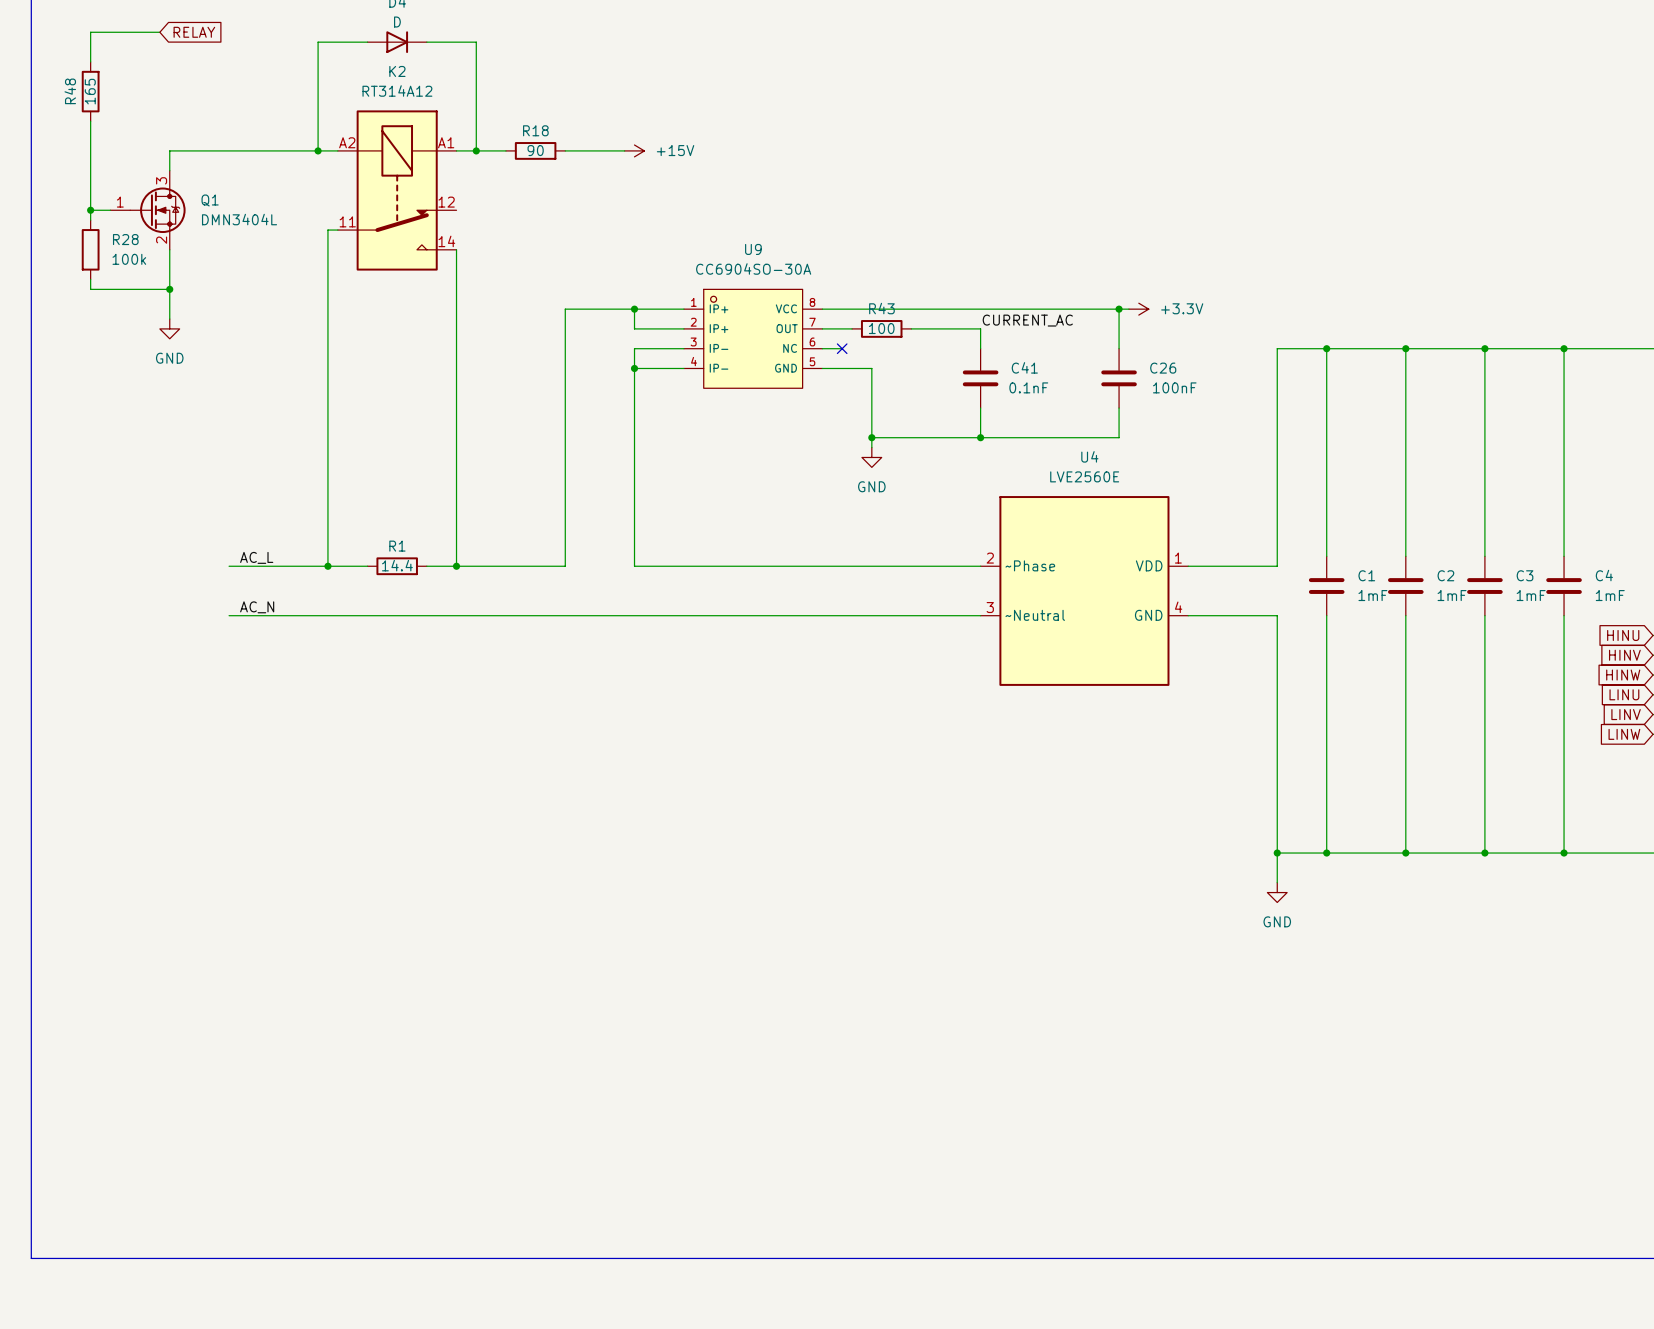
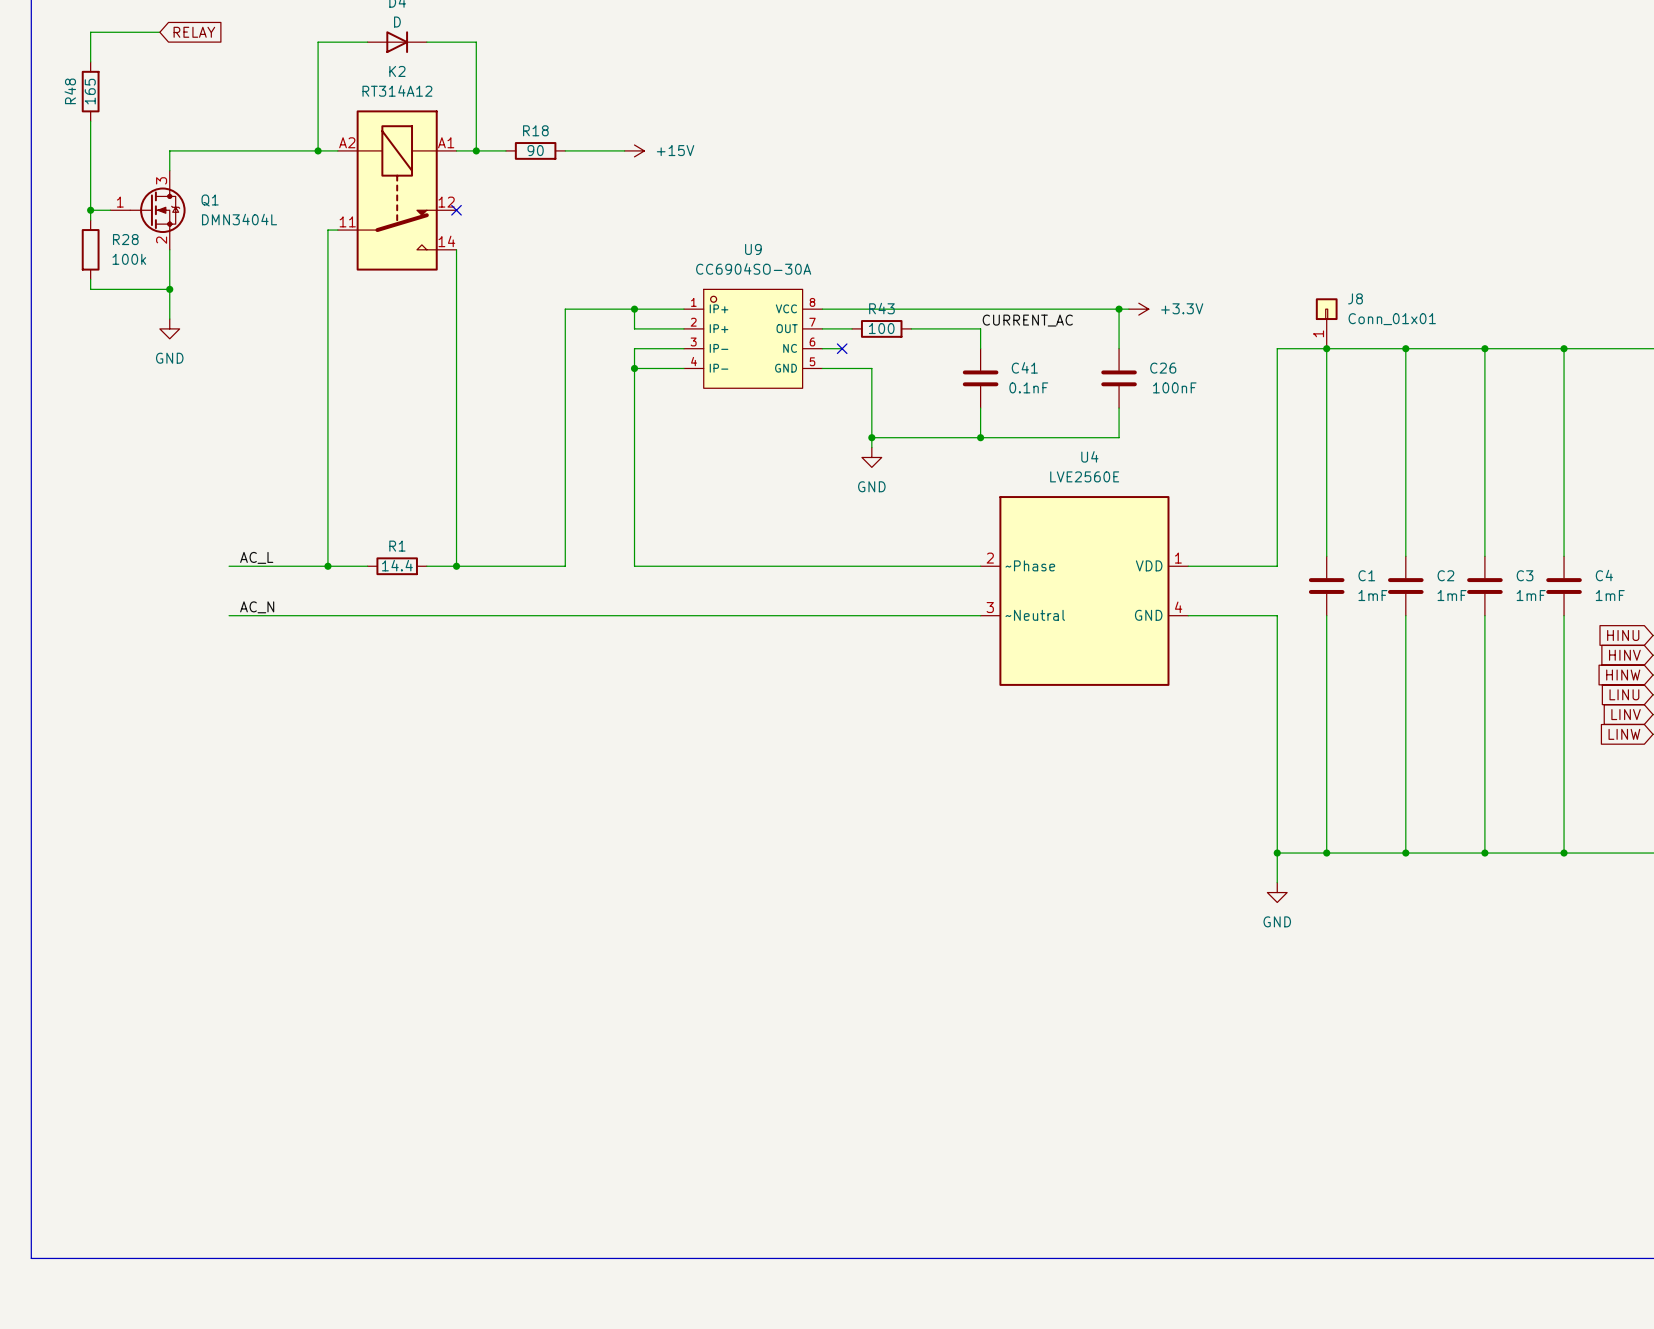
no-connect mark: none -> (456, 210)
J8: none -> Conn_01x01 (1326, 323)

